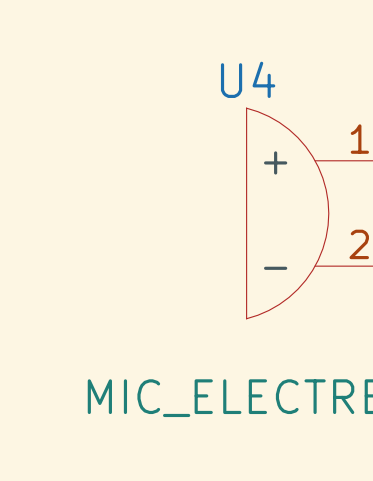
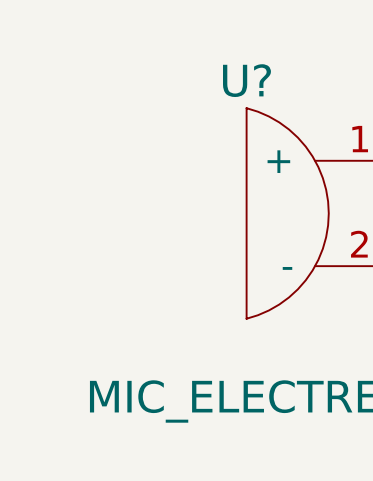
U4 name: U4 (248, 79) -> U? (246, 80)

